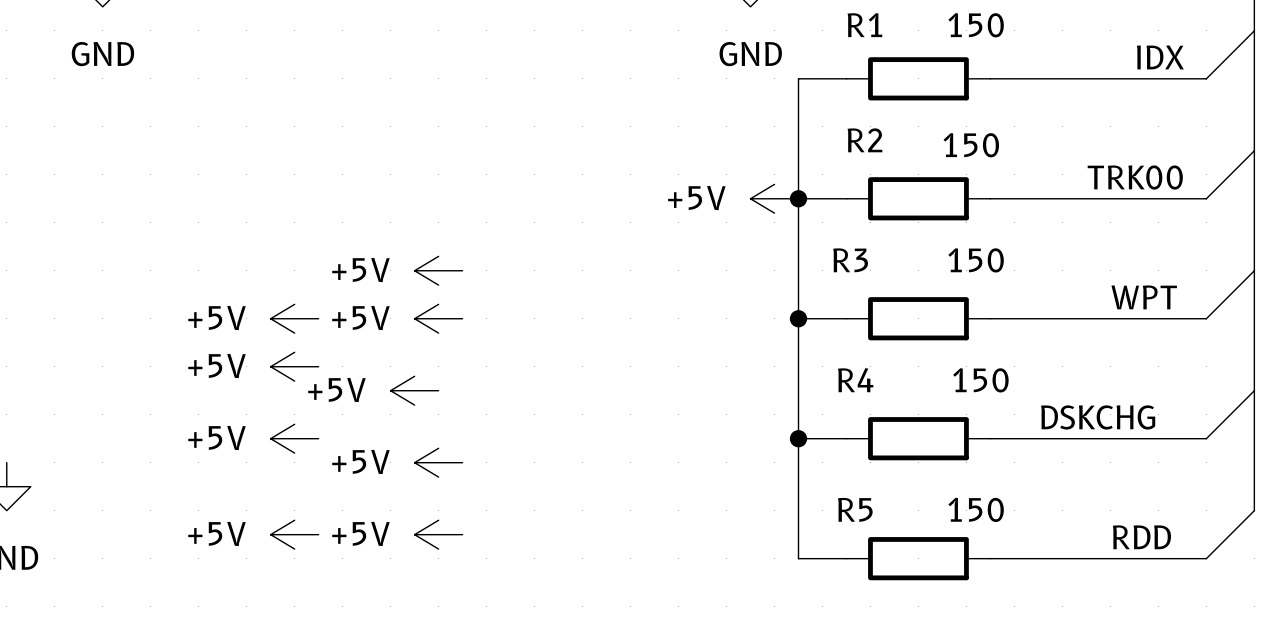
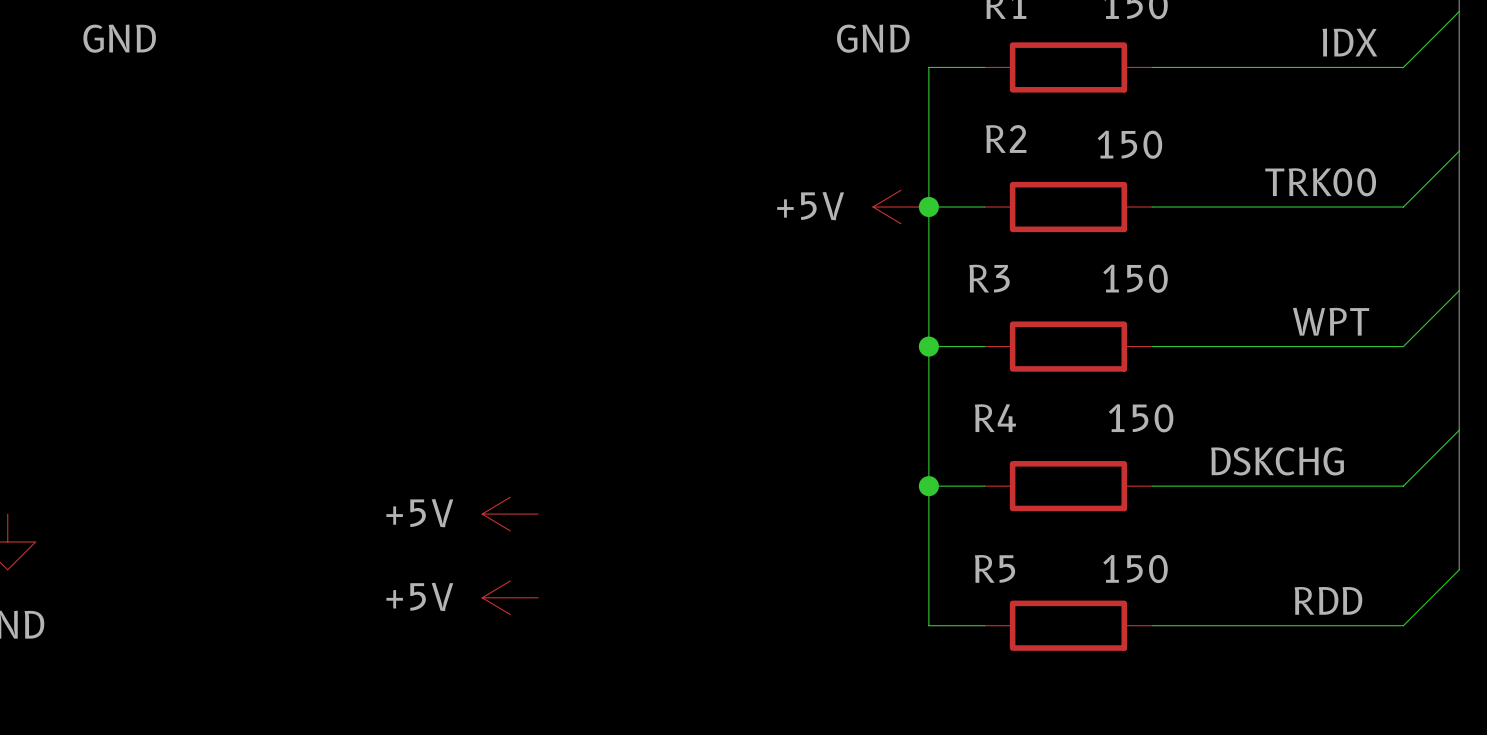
power symbol: +5V (438, 270) -> none
power symbol: +5V (294, 318) -> none
power symbol: +5V (438, 318) -> none
power symbol: +5V (294, 366) -> none
power symbol: +5V (414, 390) -> none
power symbol: +5V (294, 438) -> none
power symbol: +5V (294, 534) -> none

